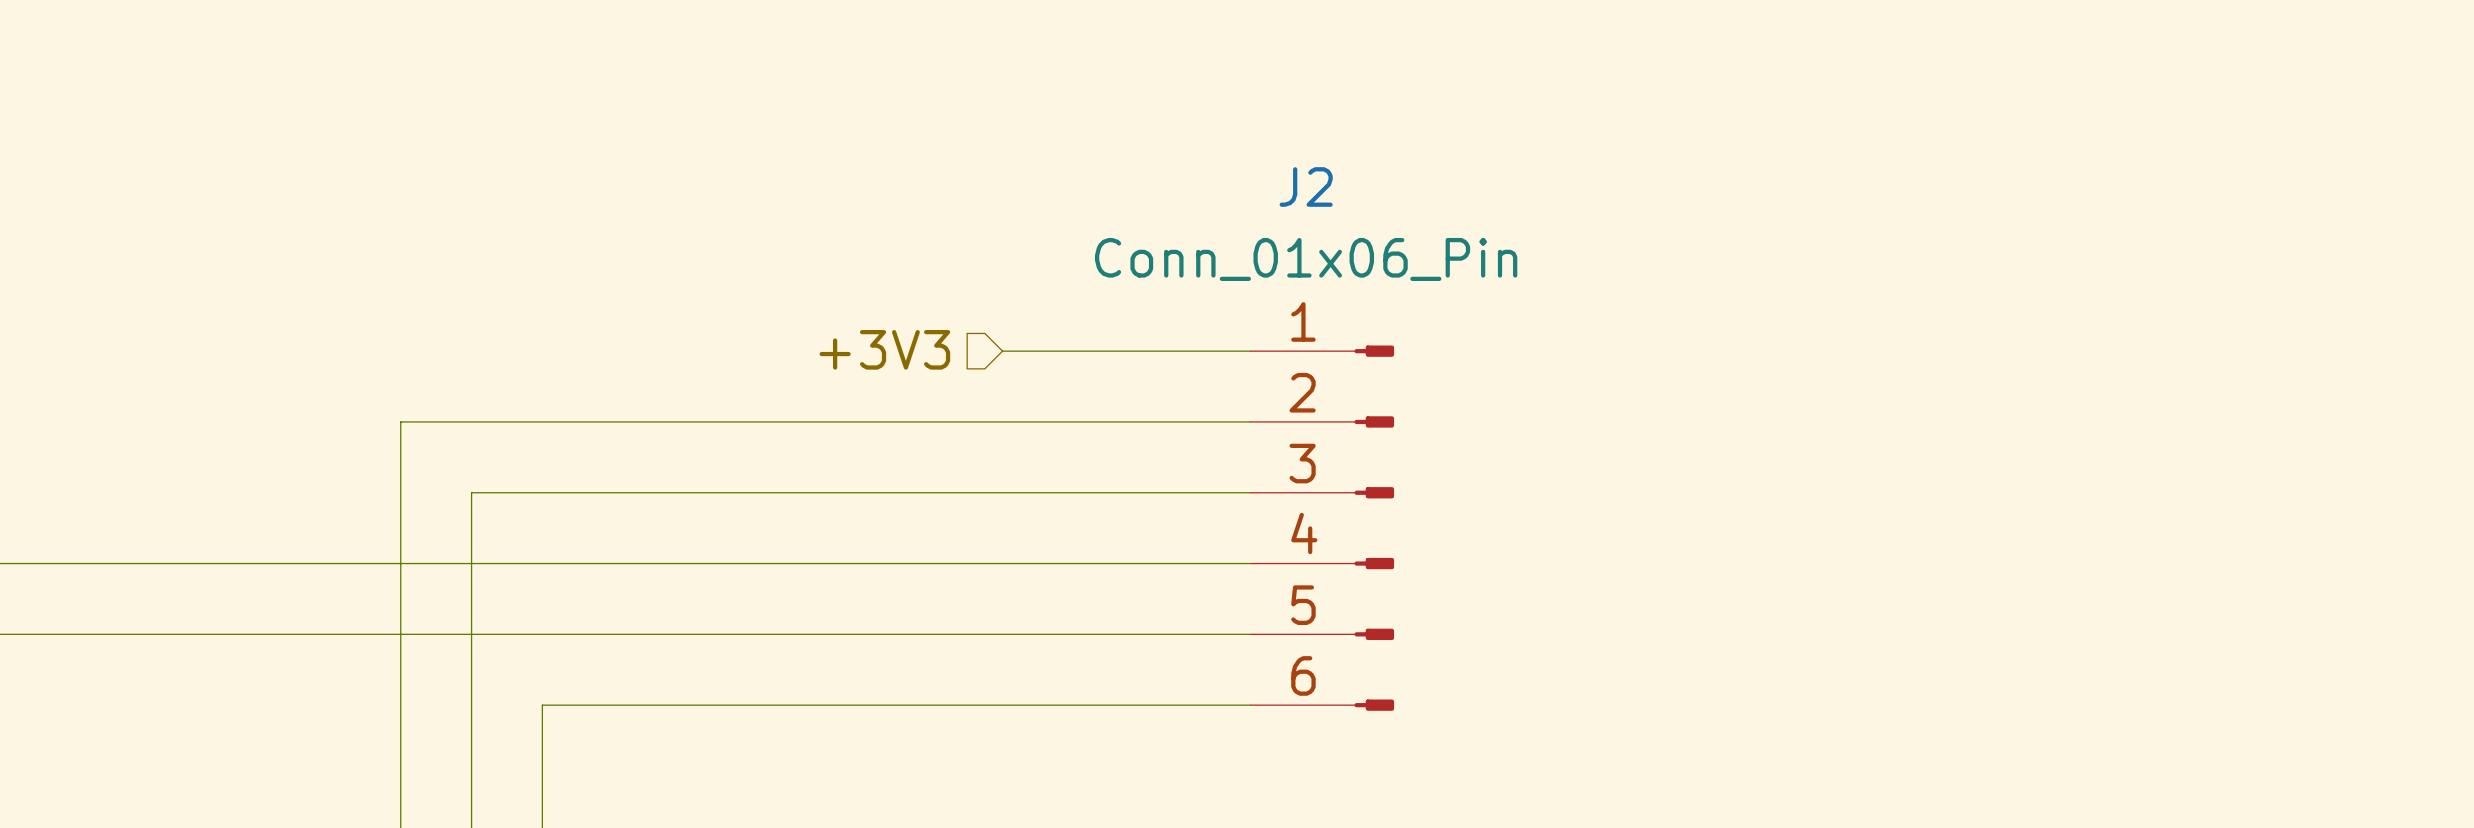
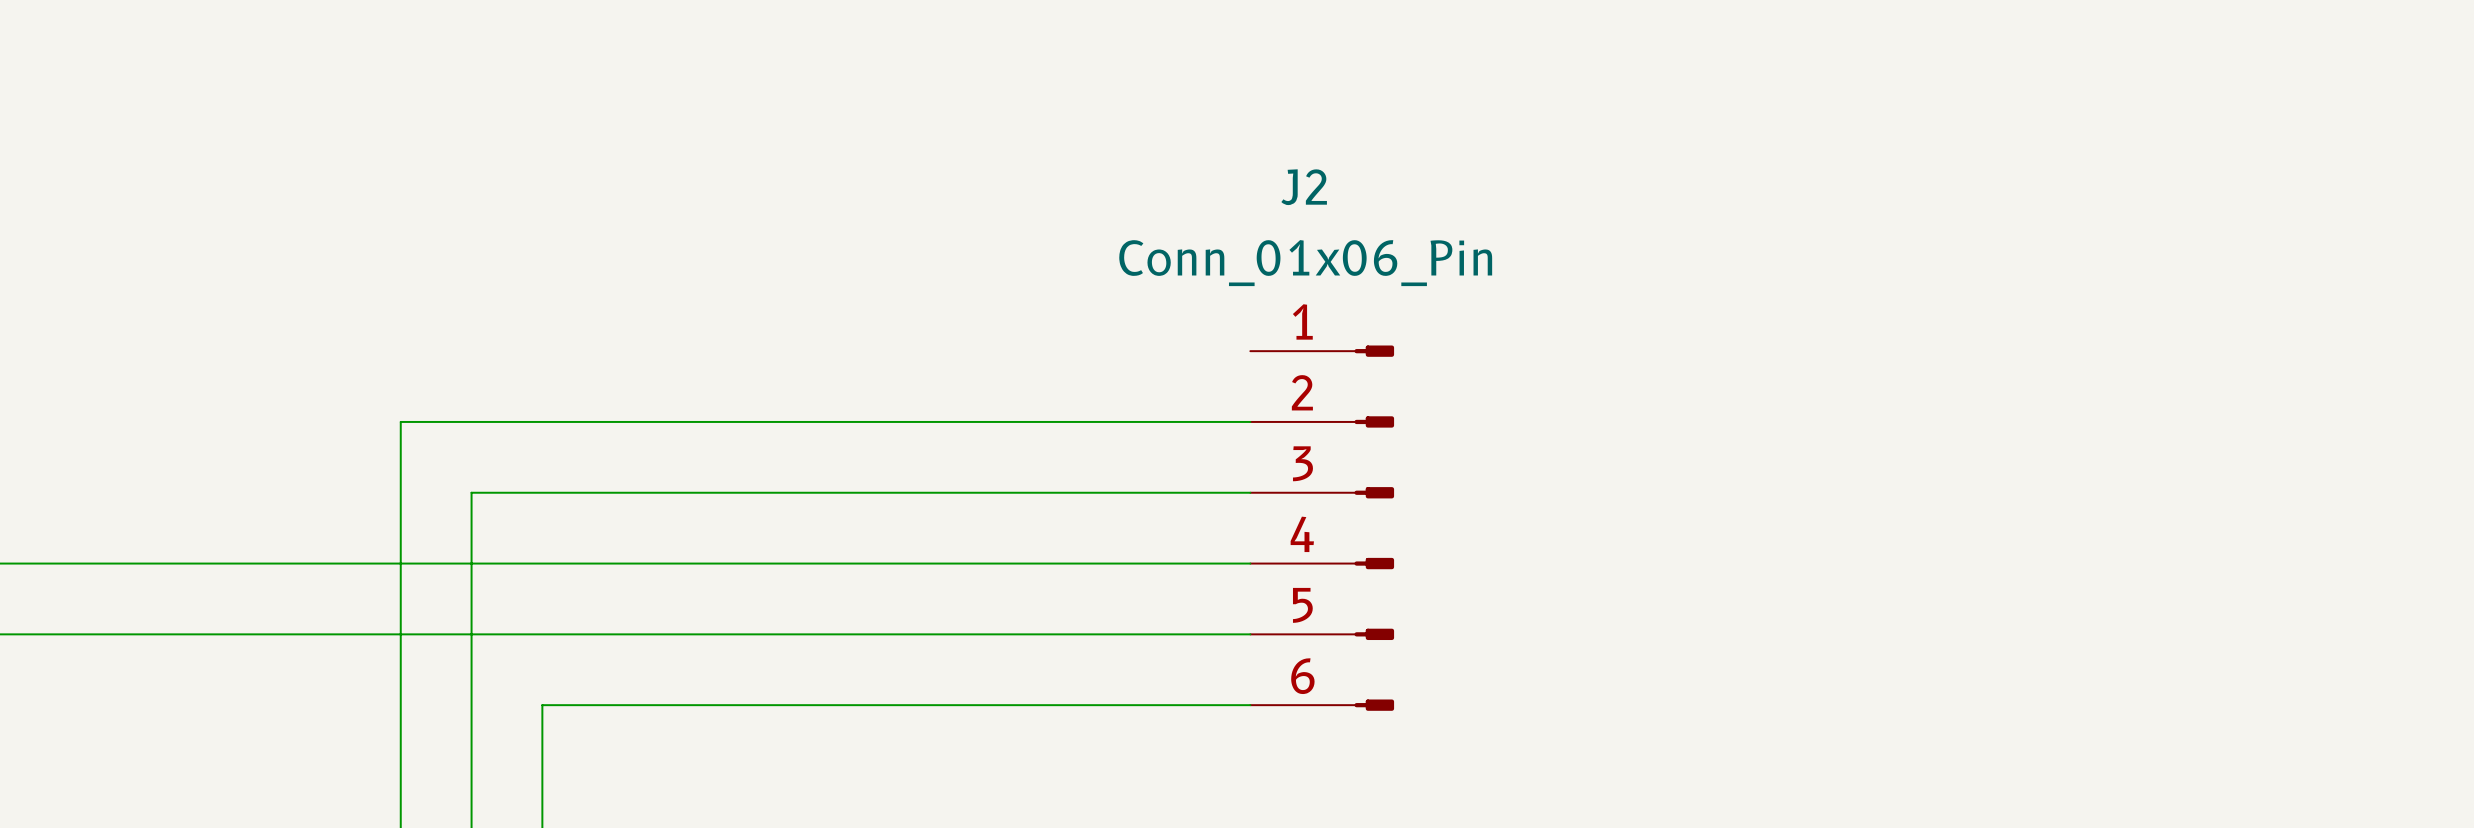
hierarchical label: +3V3 (884, 349) -> none
wire: (1002, 351) (1250, 351) -> none

